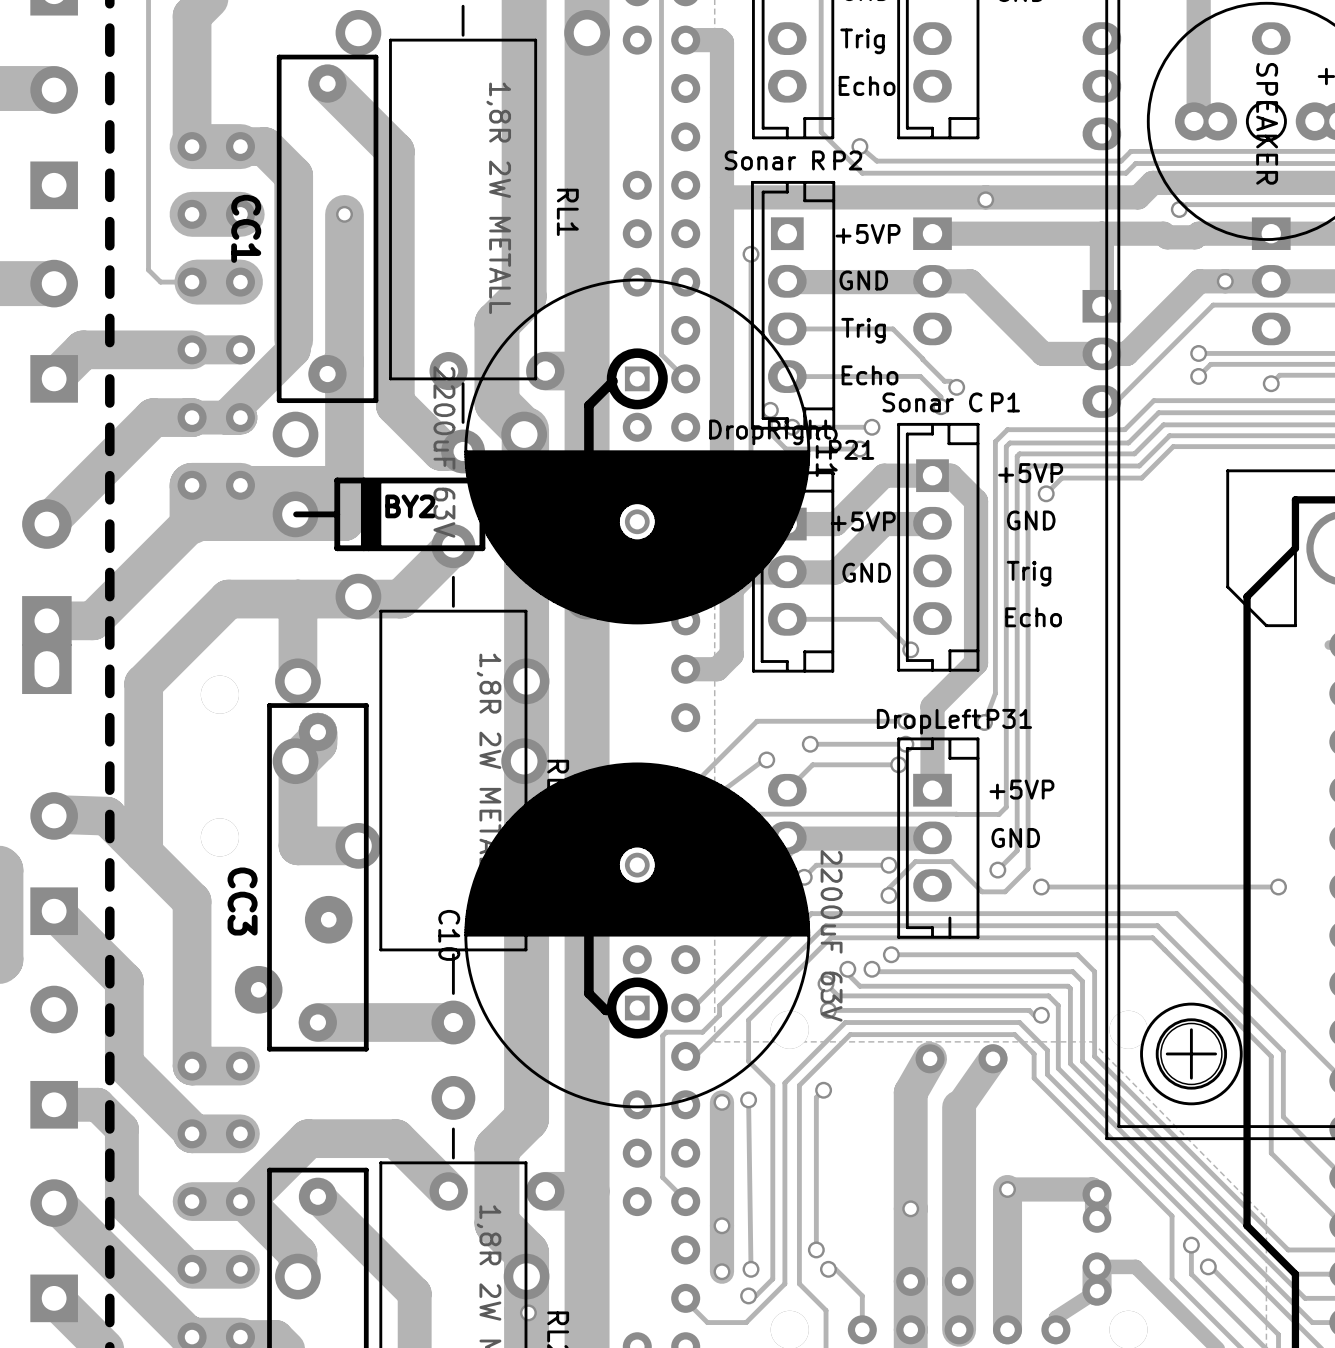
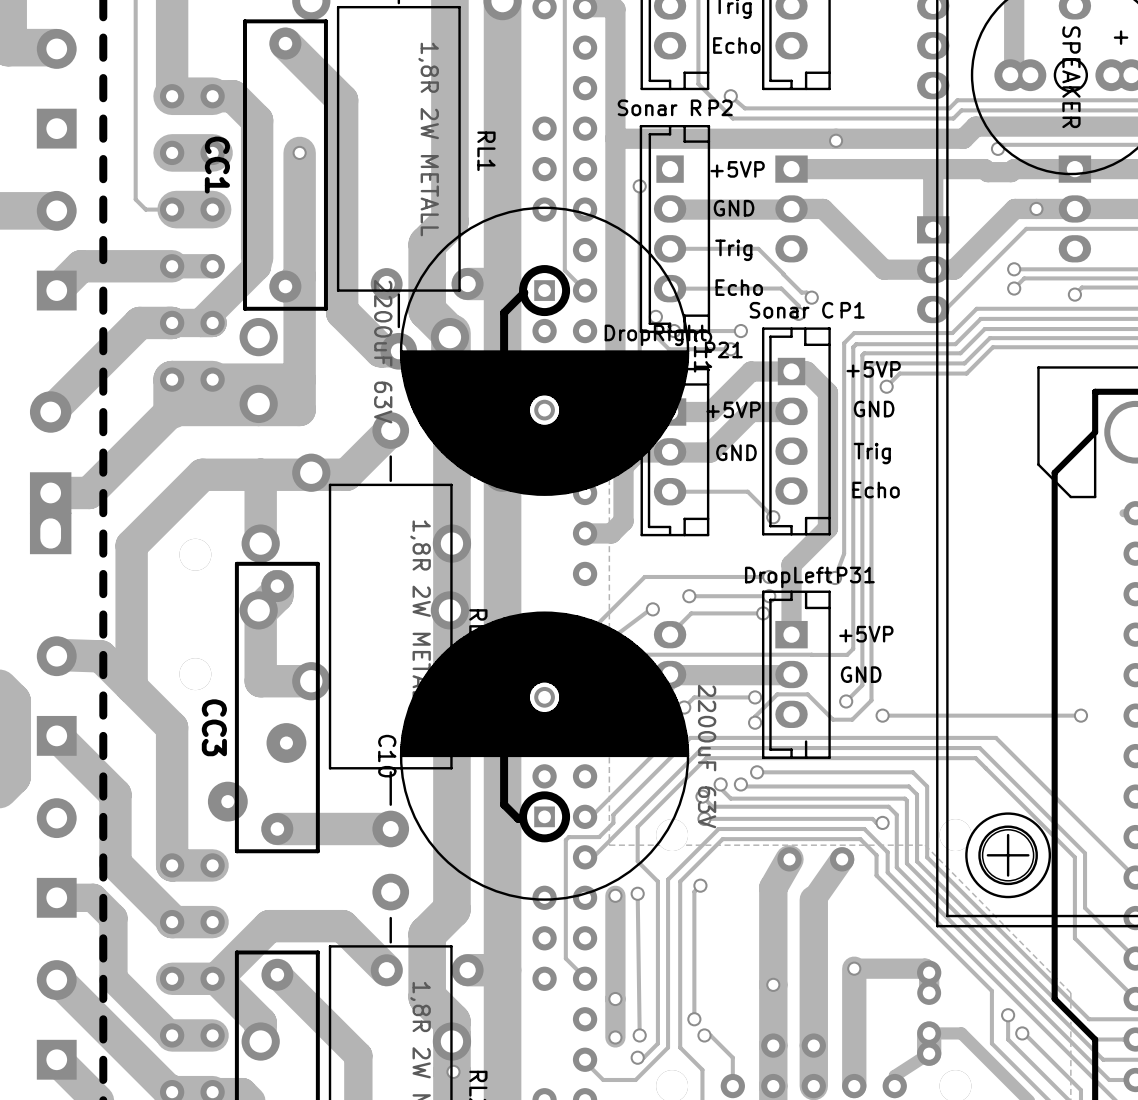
line: (363, 480) (363, 548) -> none
line: (482, 480) (337, 480) (337, 548) (482, 548) (482, 480) -> none
line: (368, 482) (368, 548) -> none
line: (373, 482) (373, 545) -> none
line: (378, 482) (378, 545) -> none
text: BY2 (410, 506) -> none
line: (337, 514) (296, 514) -> none

